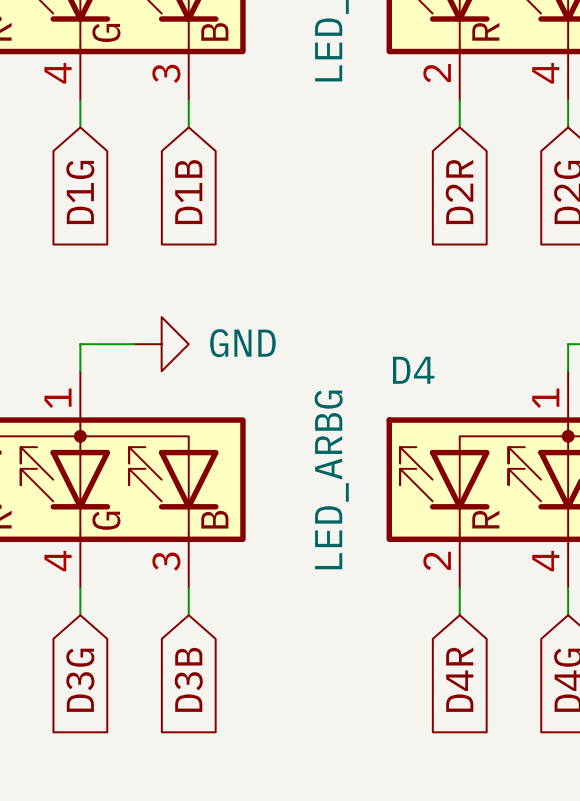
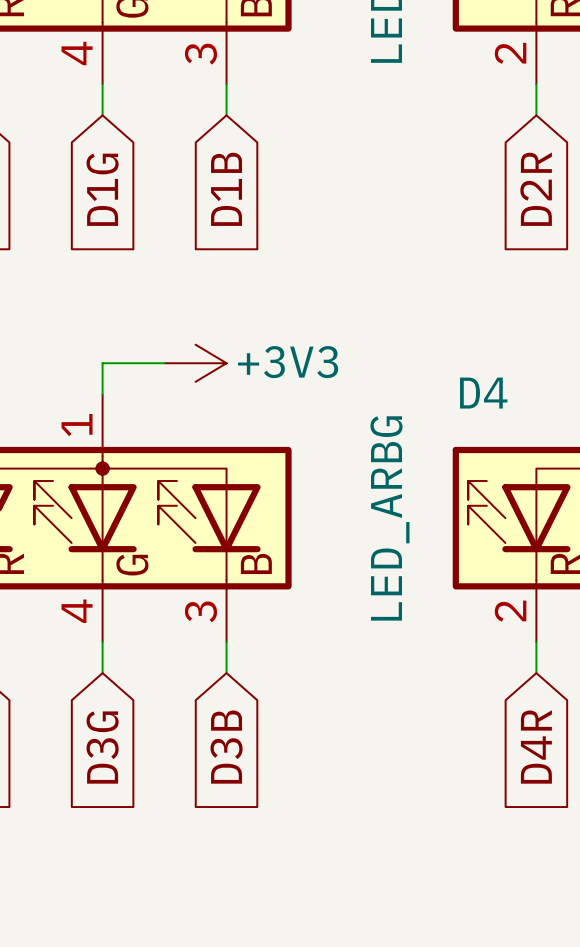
power symbol: GND (161, 344) -> +3V3 (195, 363)

